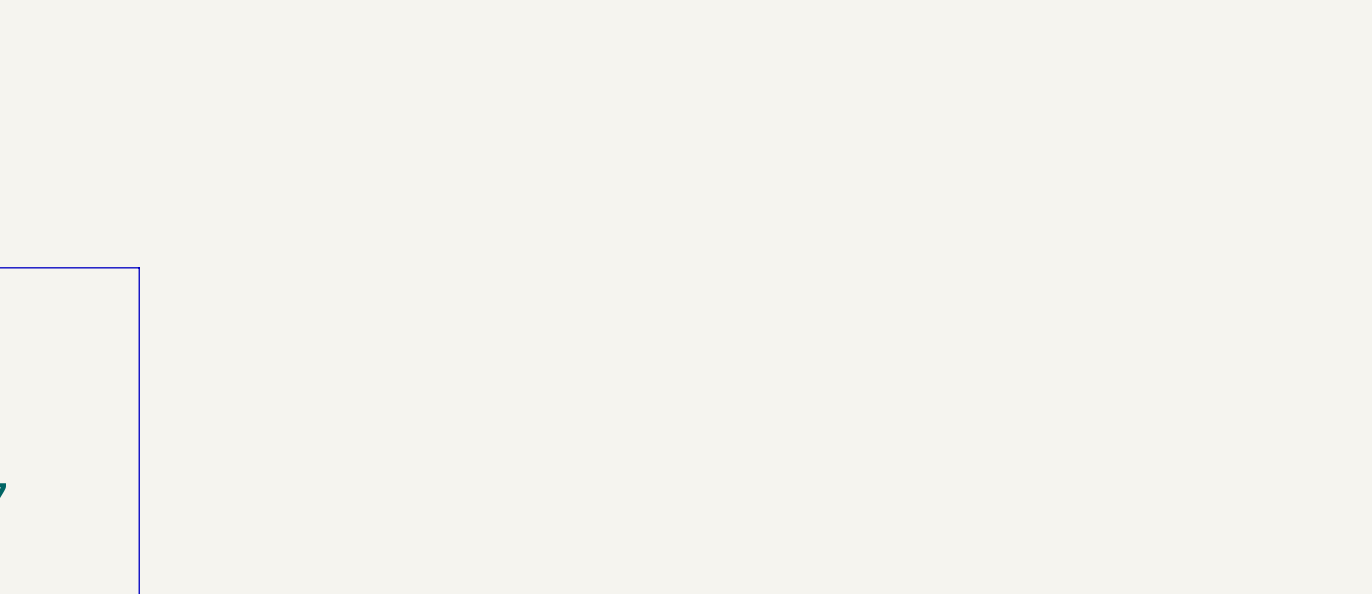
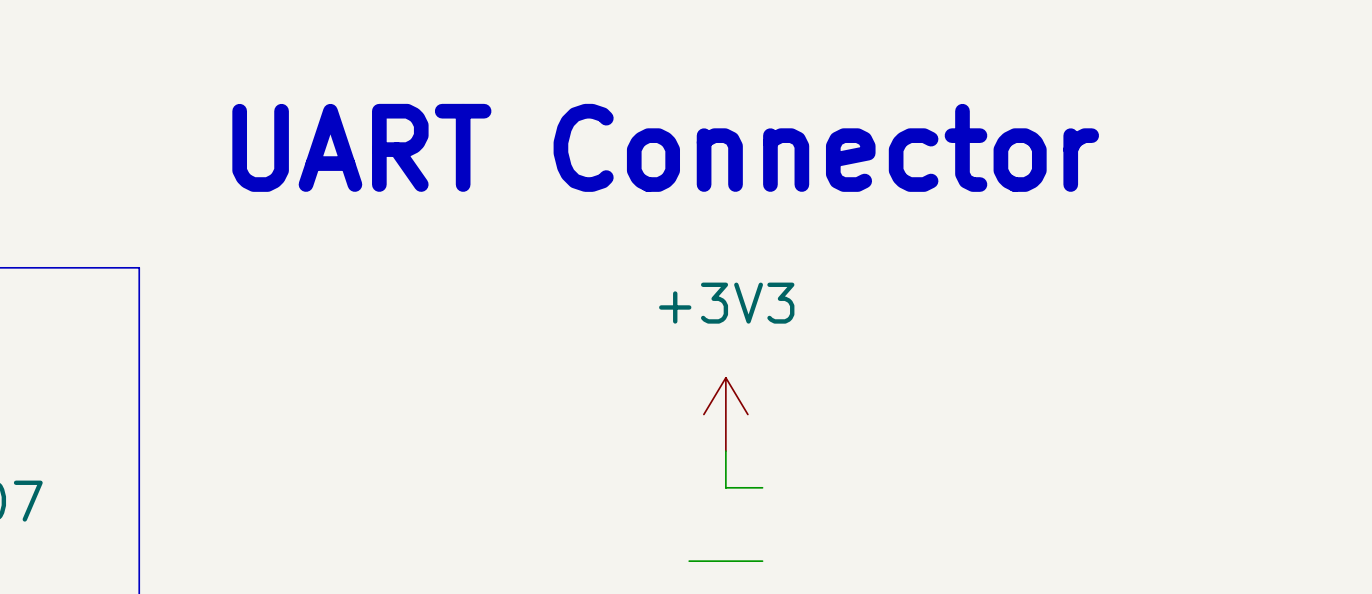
text: none -> UART Connector (665, 147)
power symbol: none -> +3V3 (725, 414)
wire: none -> (725, 451) (725, 487) (762, 487)
wire: none -> (689, 561) (762, 561)

